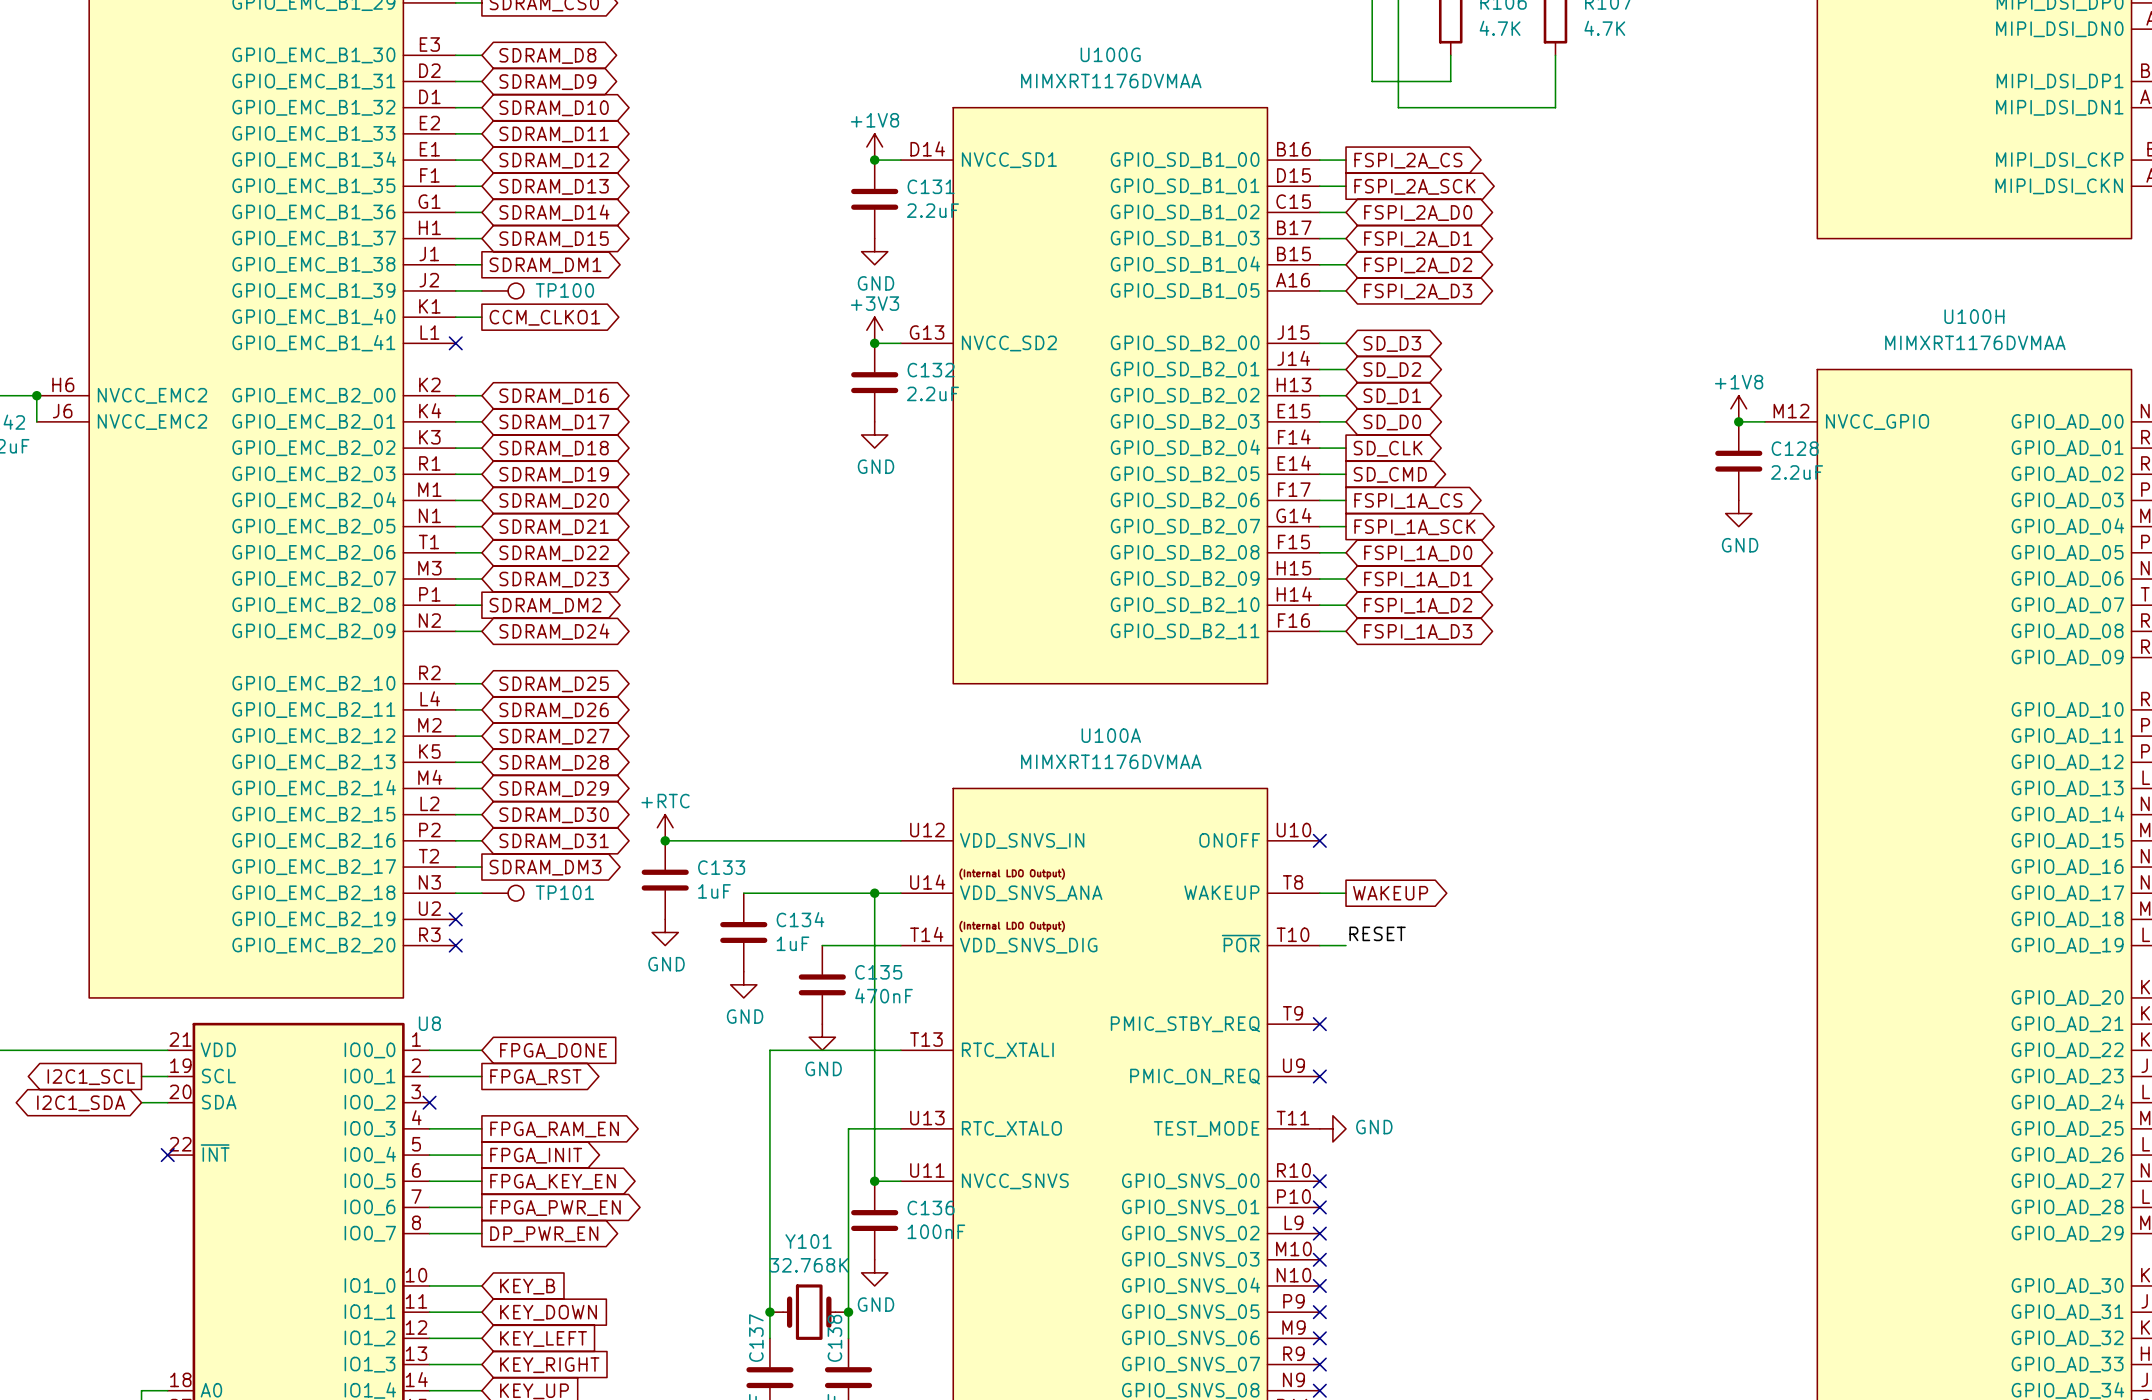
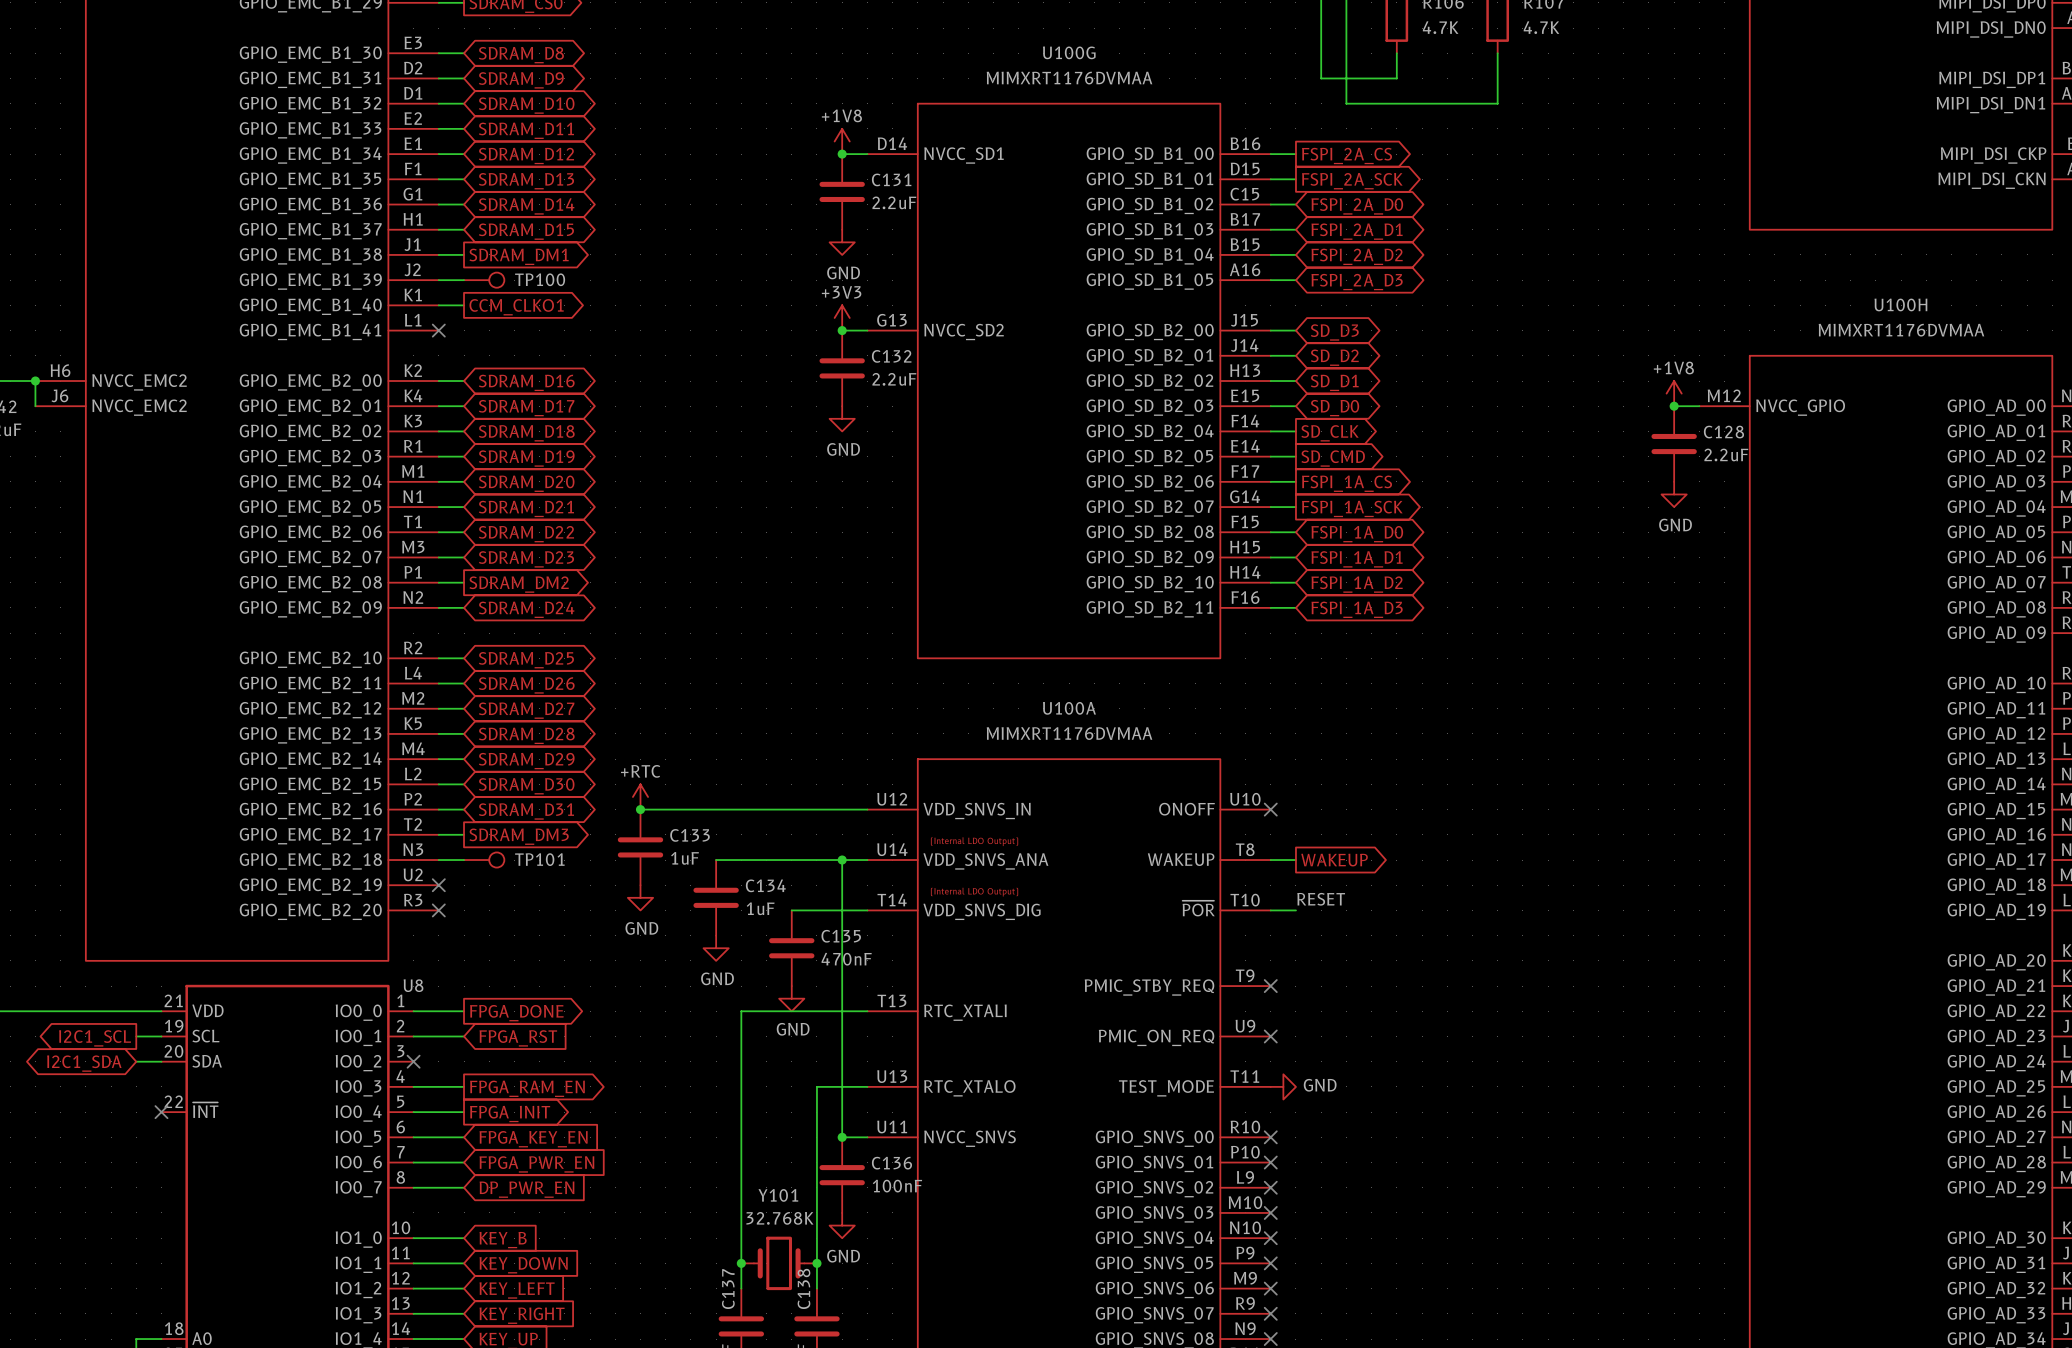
global label shape: input (553, 1050) -> output (516, 1013)
global label shape: output (535, 1077) -> input (518, 1038)
global label shape: output (553, 1181) -> input (533, 1139)
global label shape: output (555, 1208) -> input (536, 1164)
global label shape: output (544, 1234) -> input (526, 1189)

